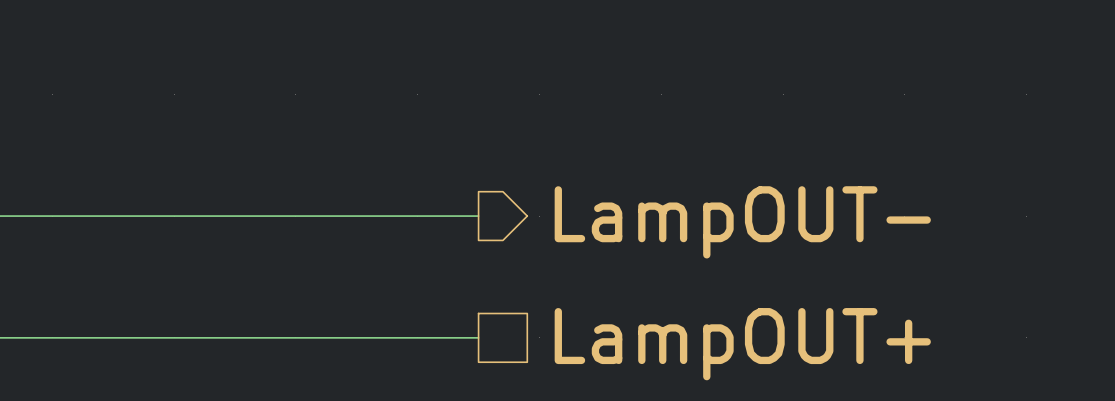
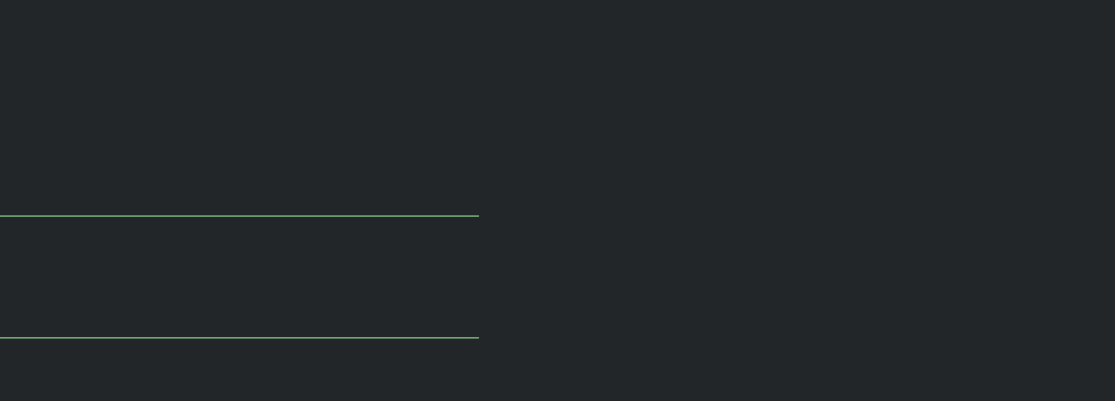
hierarchical label: LampOUT- (742, 222) -> none
hierarchical label: LampOUT+ (742, 344) -> none

